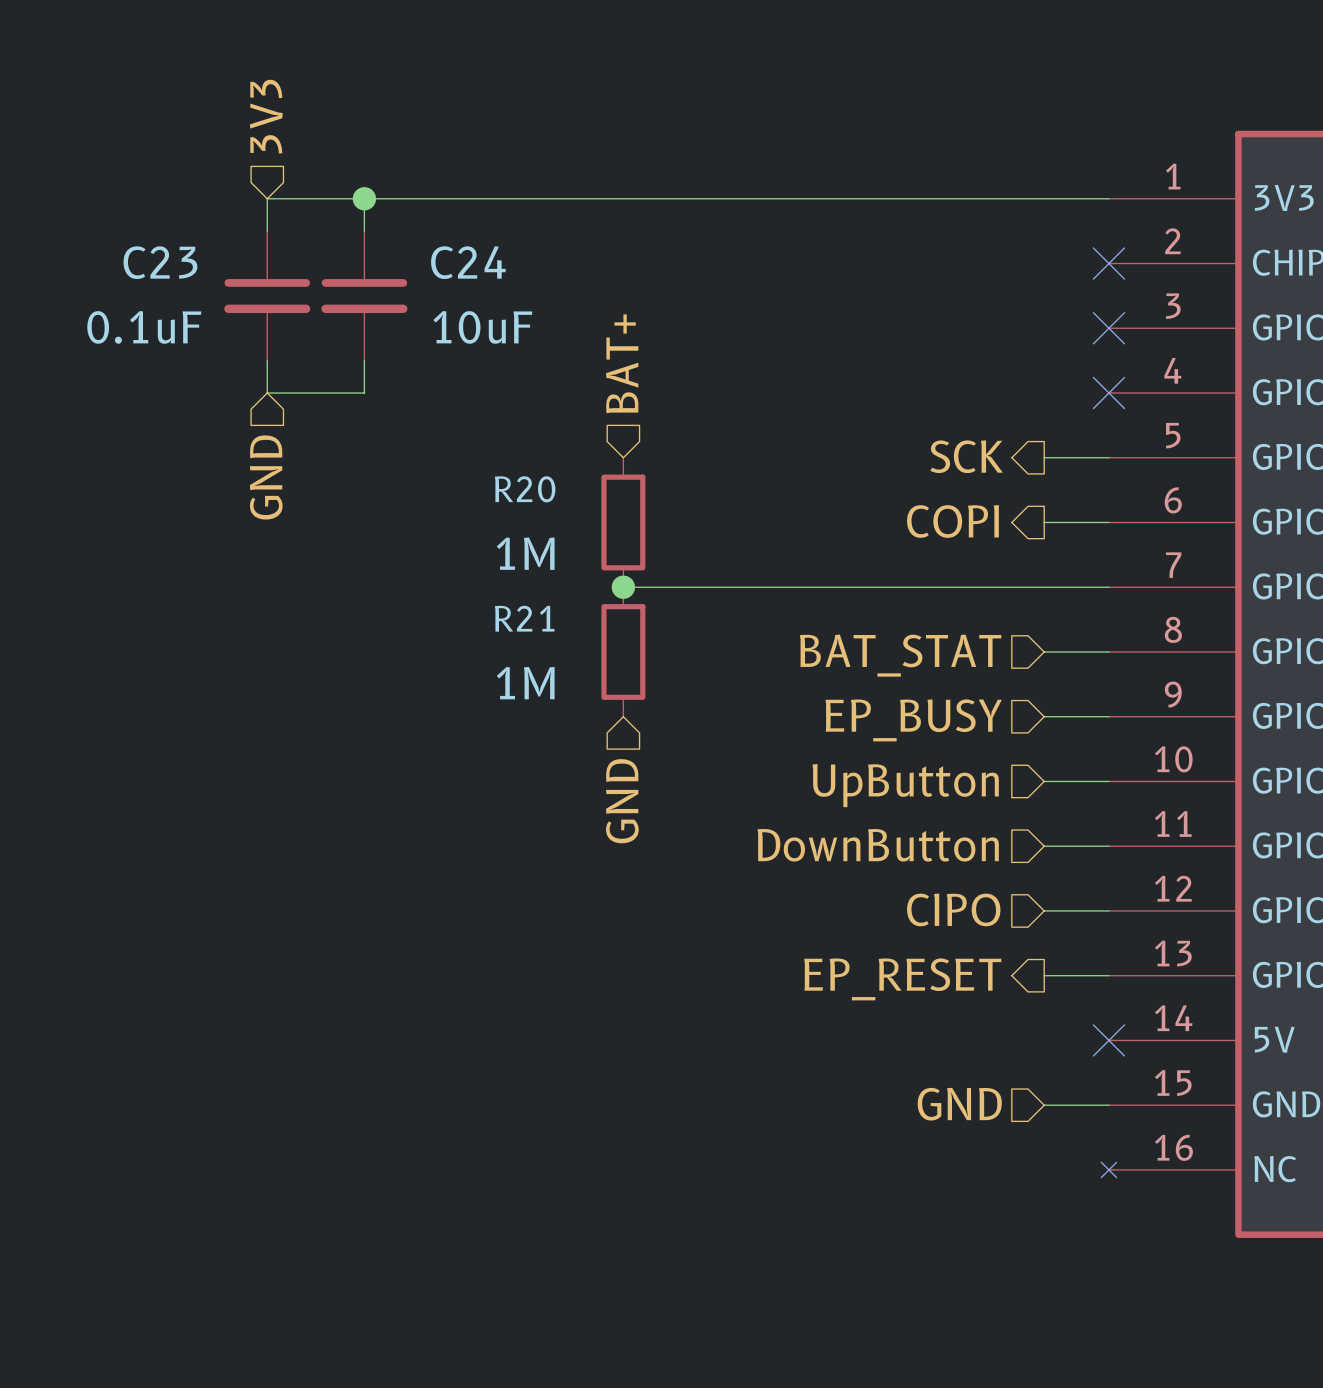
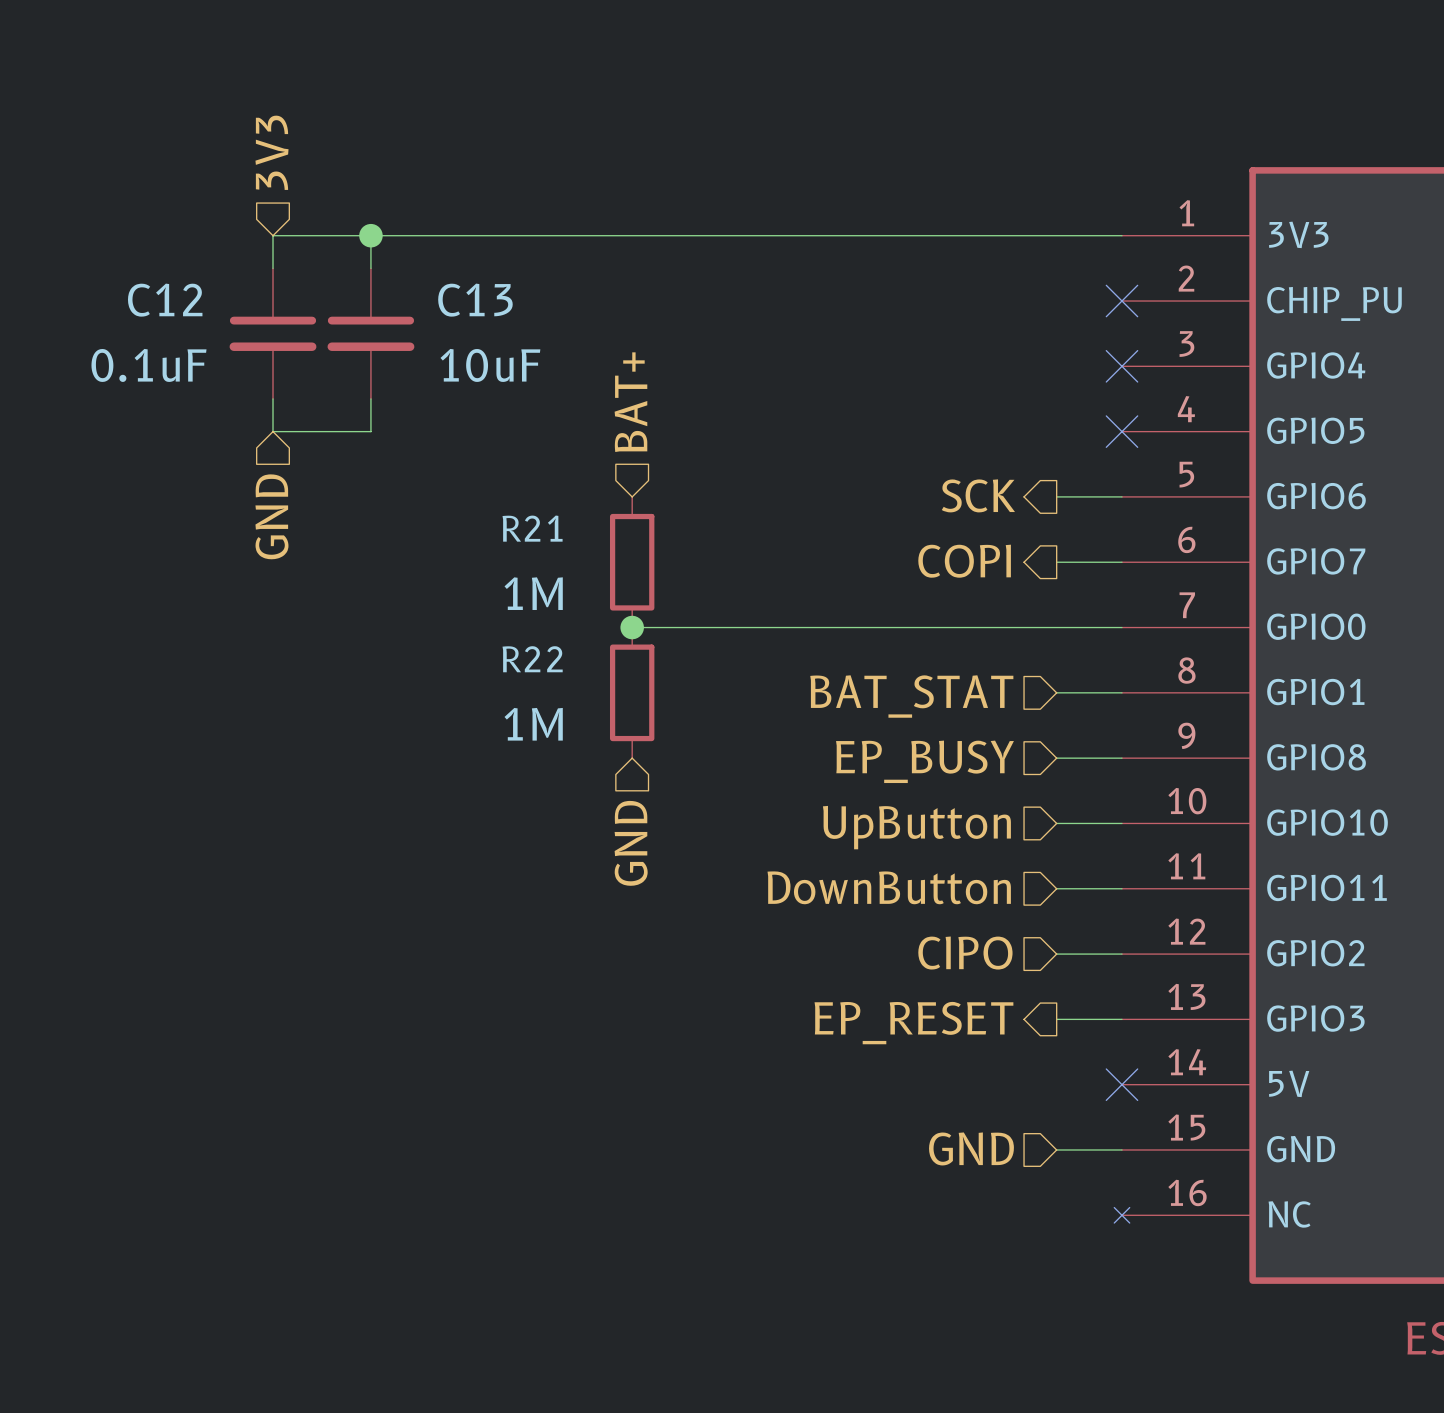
C23 name: C23 (160, 262) -> C12 (165, 300)
C24 name: C24 (468, 262) -> C13 (475, 300)
R20 name: R20 (525, 489) -> R21 (532, 528)
R21 name: R21 (524, 618) -> R22 (532, 659)

